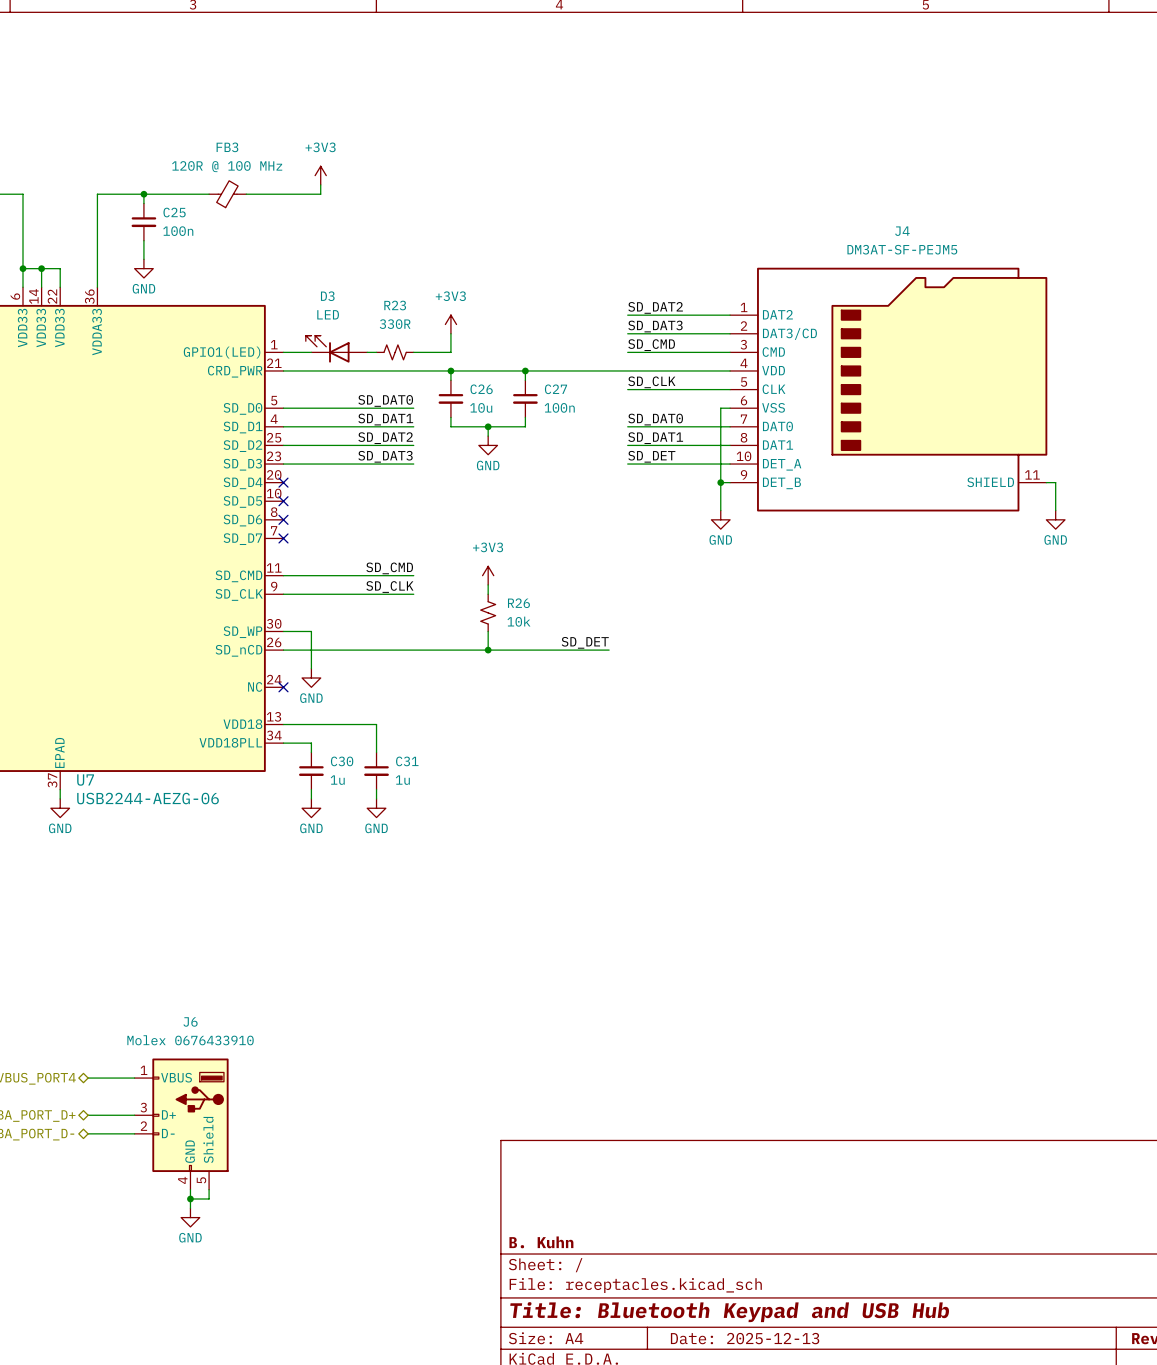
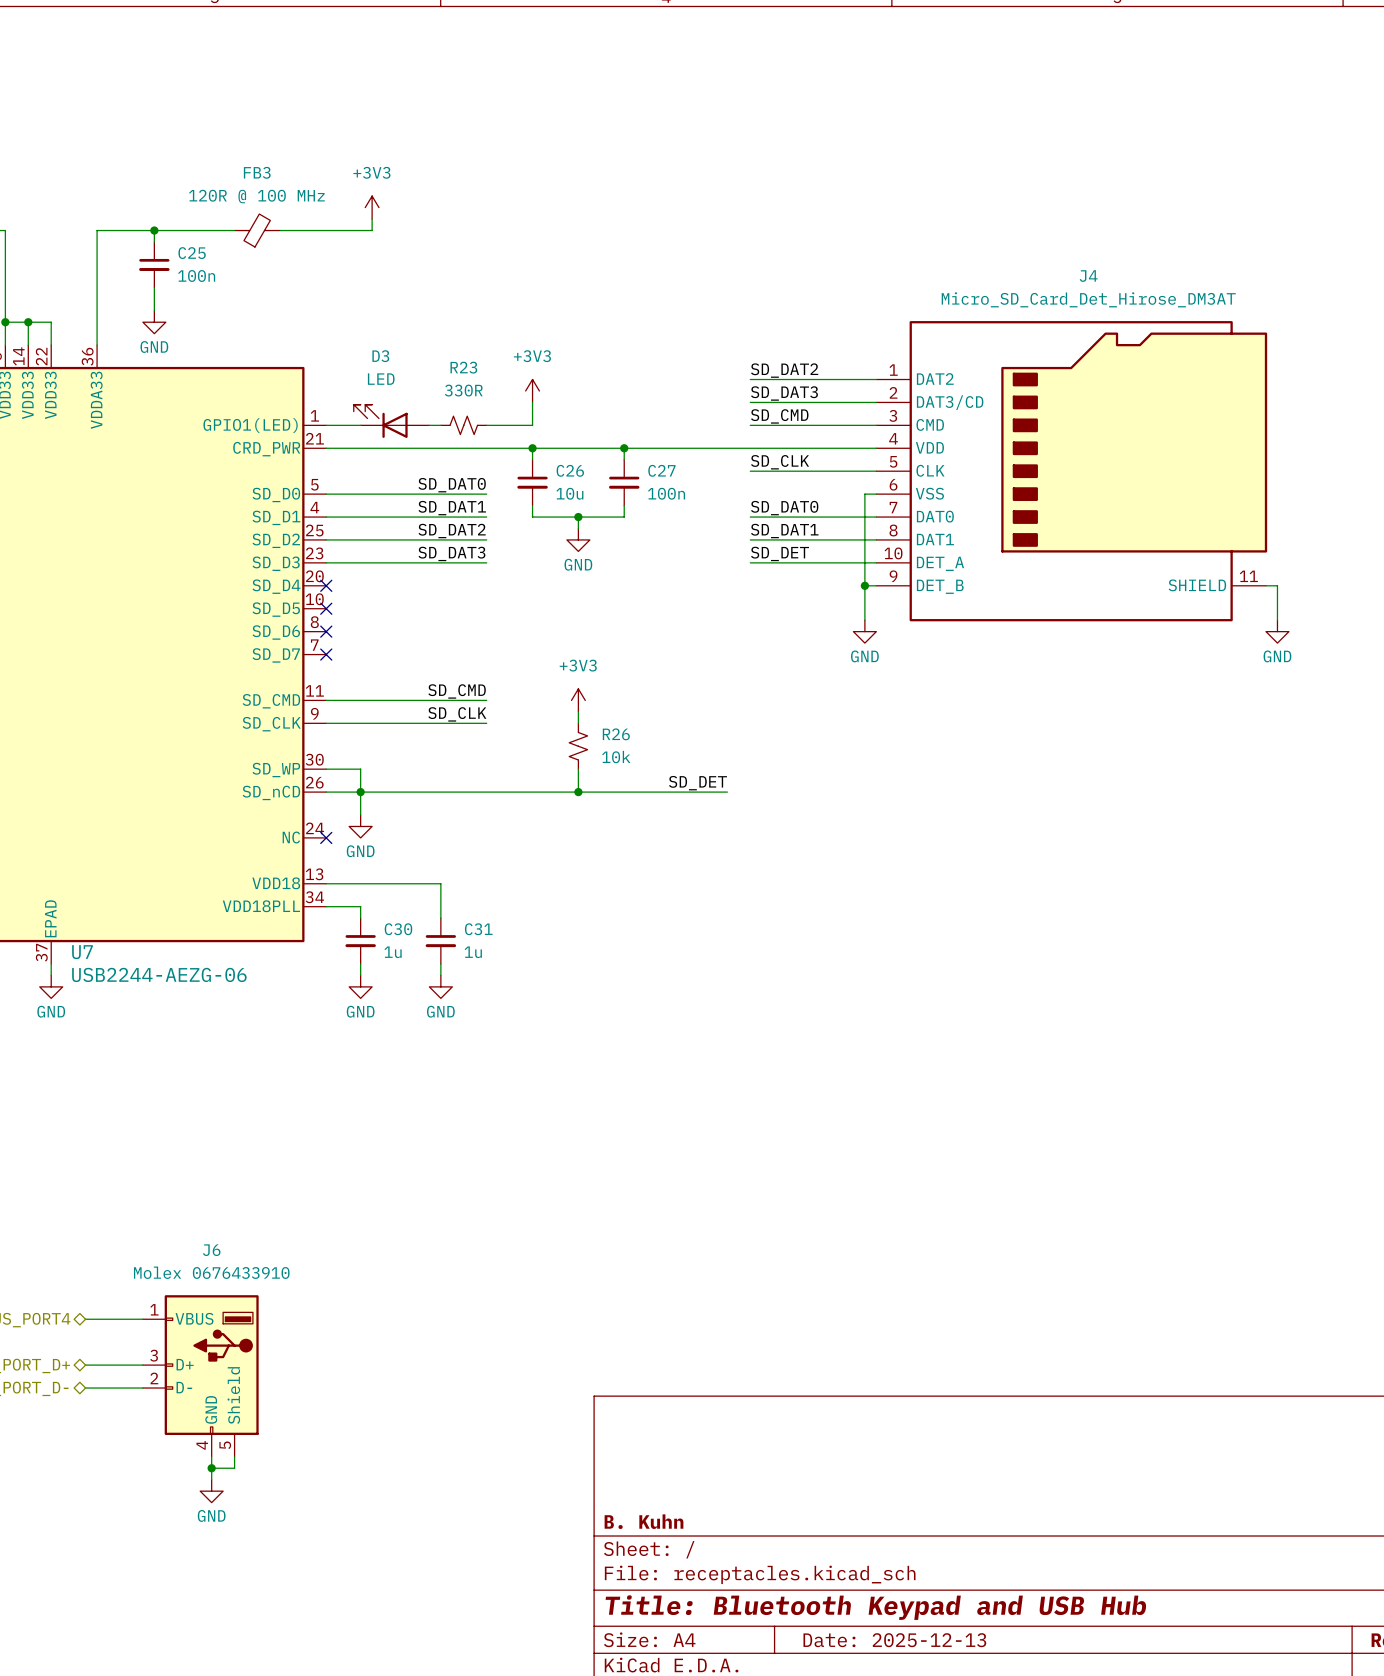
J4 value: DM3AT-SF-PEJM5 (902, 249) -> Micro_SD_Card_Det_Hirose_DM3AT (1088, 299)
junction: none -> (360, 792)

